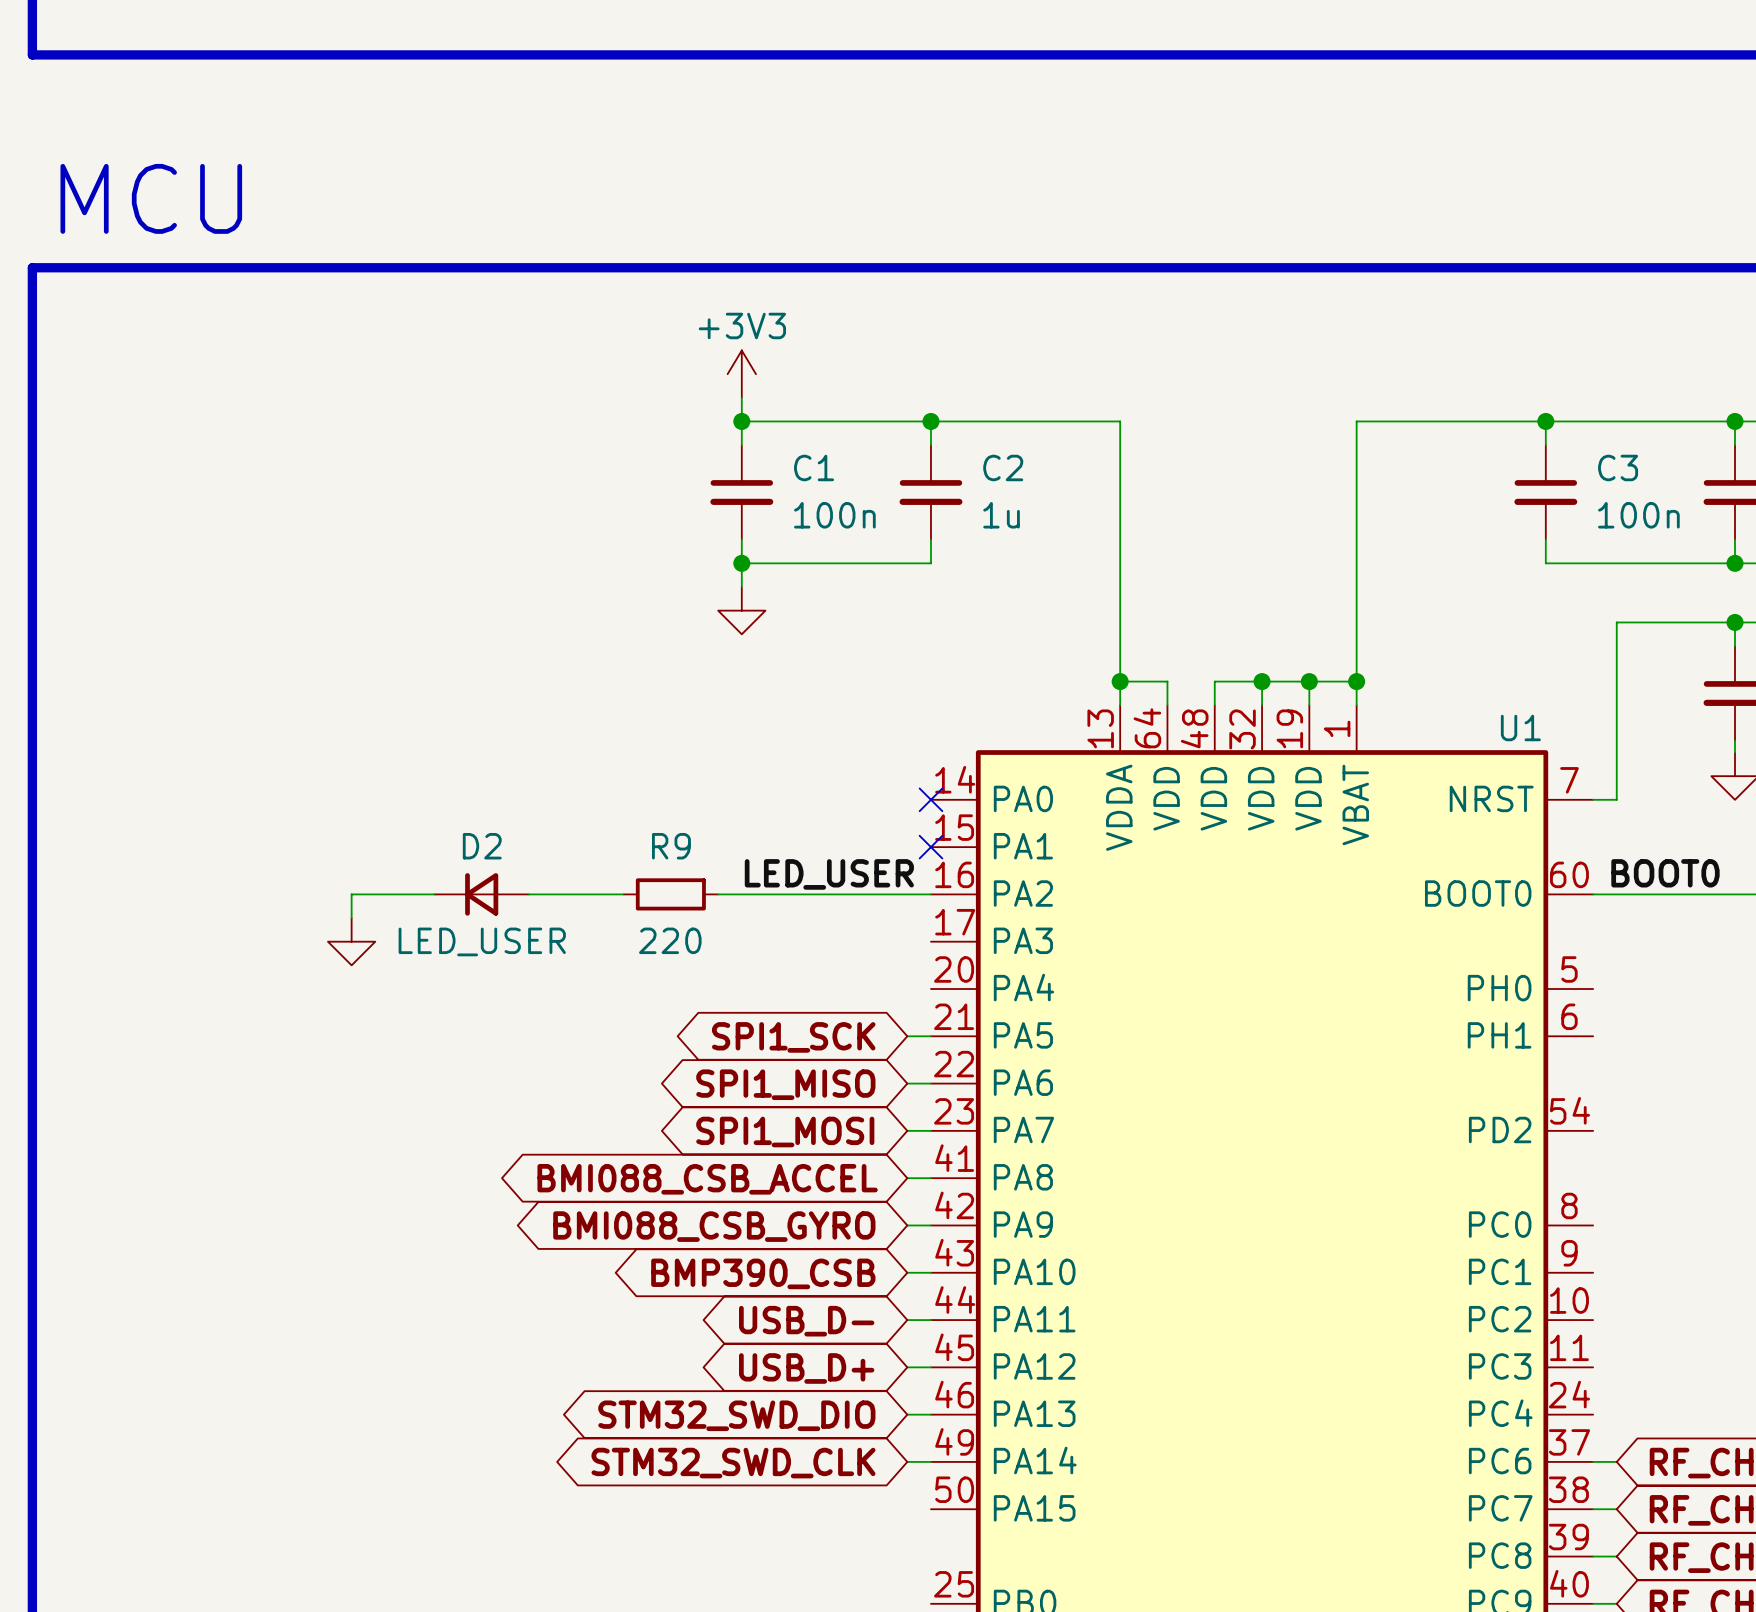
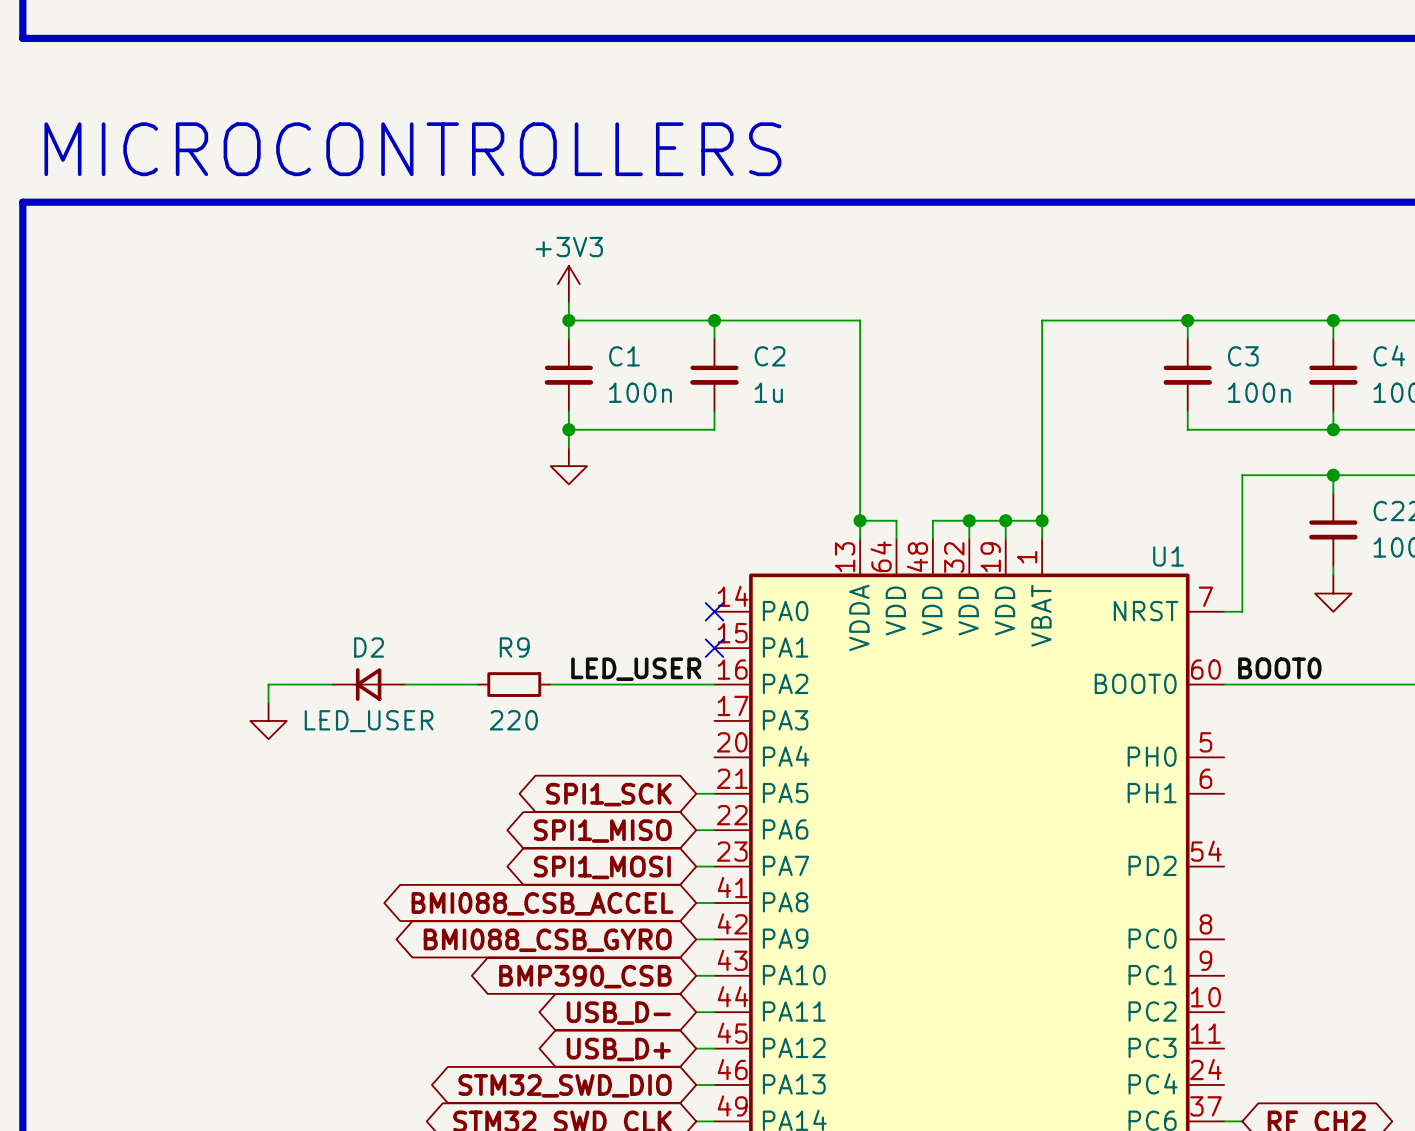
text: MCU (151, 198) -> MICROCONTROLLERS (412, 149)

